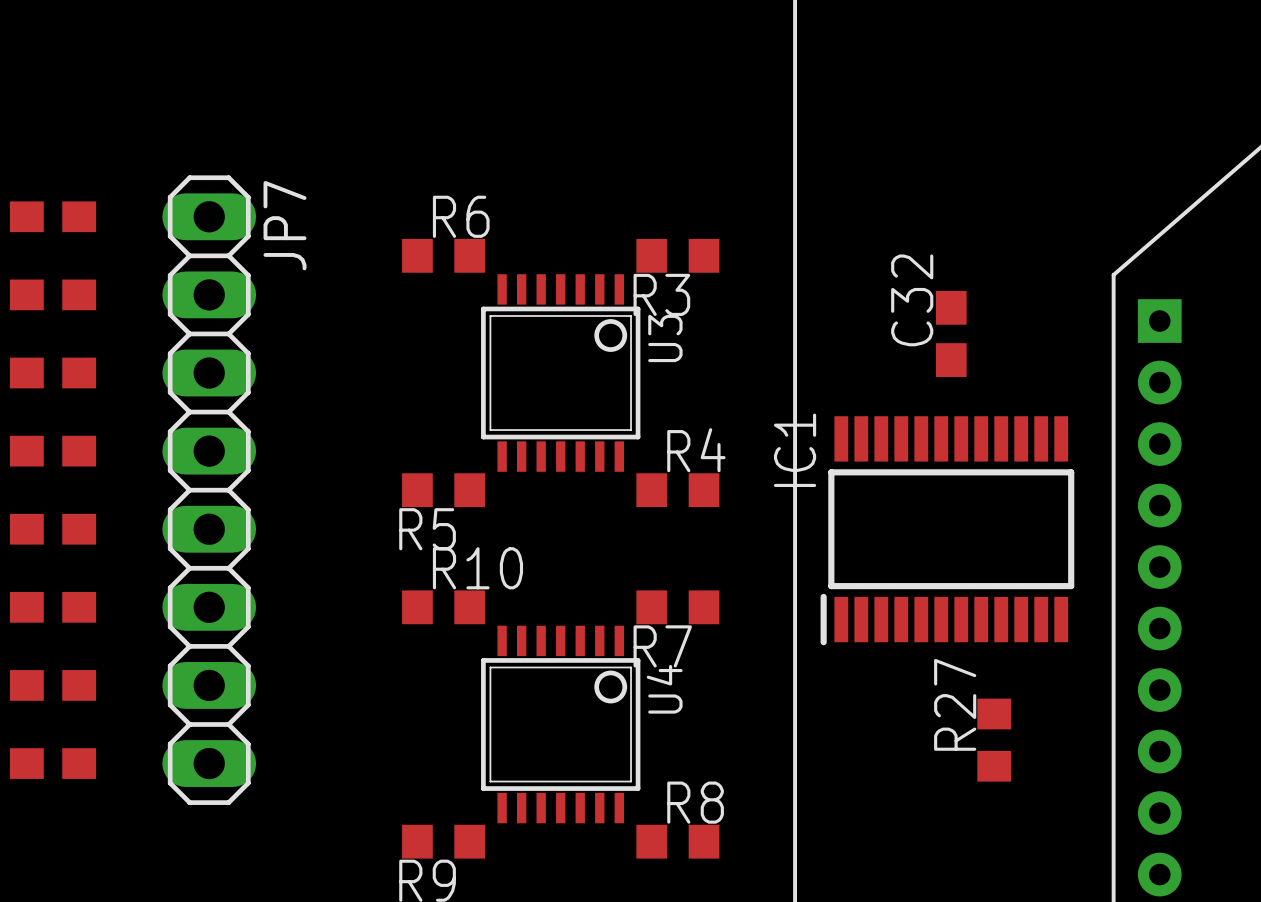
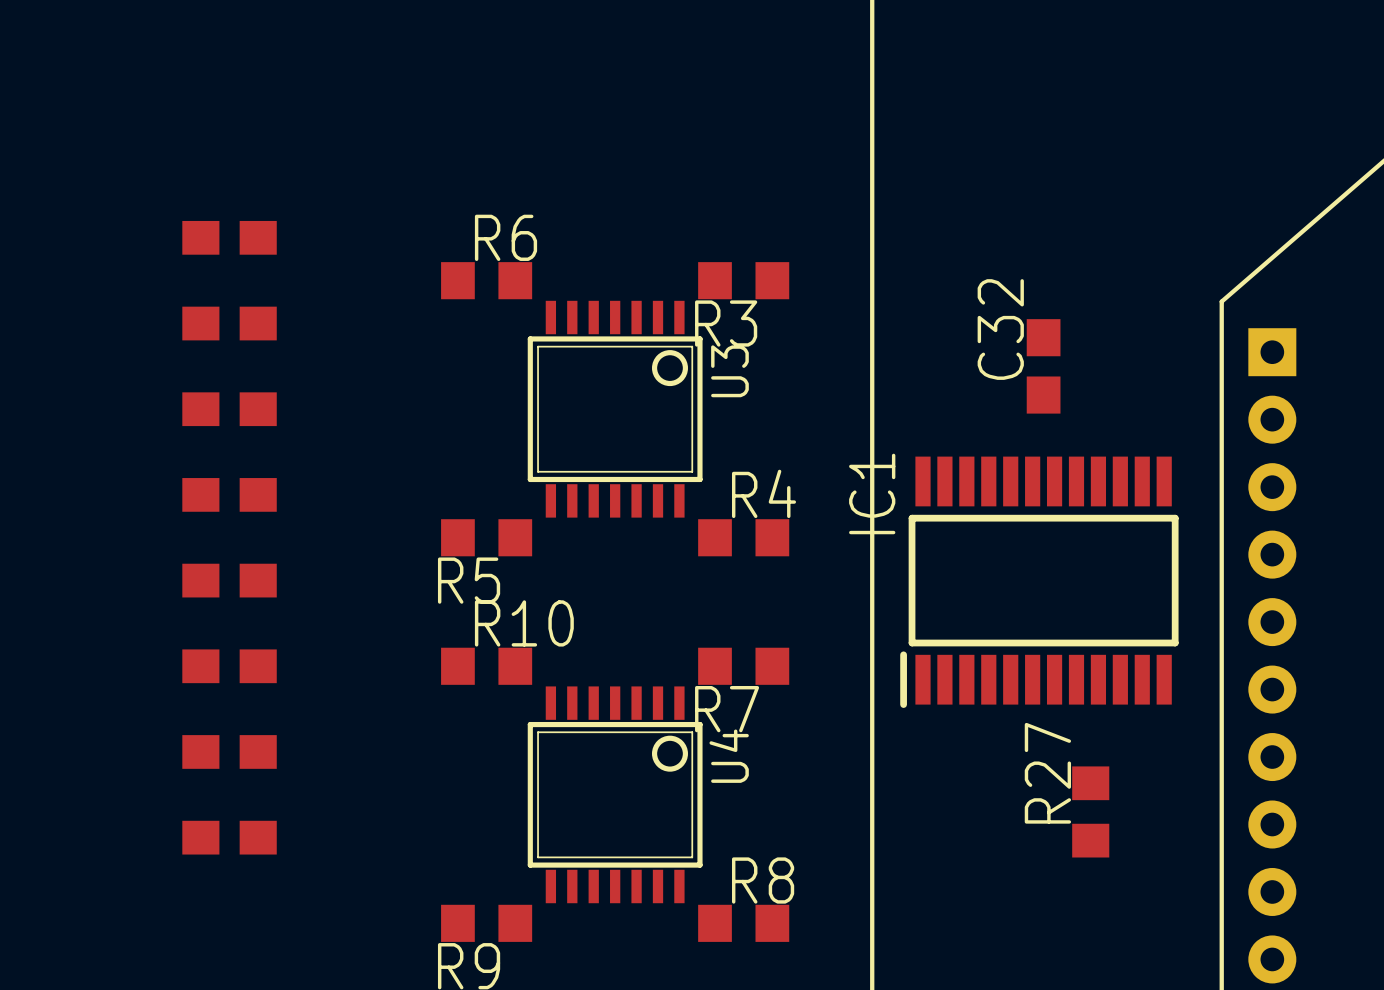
part: (53, 216) -> none
part: none -> (229, 237)
part: (53, 294) -> none
part: none -> (229, 323)
part: (53, 373) -> none
part: none -> (229, 409)
part: (53, 451) -> none
part: none -> (229, 494)
JP7: (209, 490) -> none
part: (53, 529) -> none
part: none -> (229, 580)
part: (53, 607) -> none
part: none -> (229, 666)
part: (53, 685) -> none
part: none -> (229, 751)
part: (53, 763) -> none
part: none -> (229, 837)

